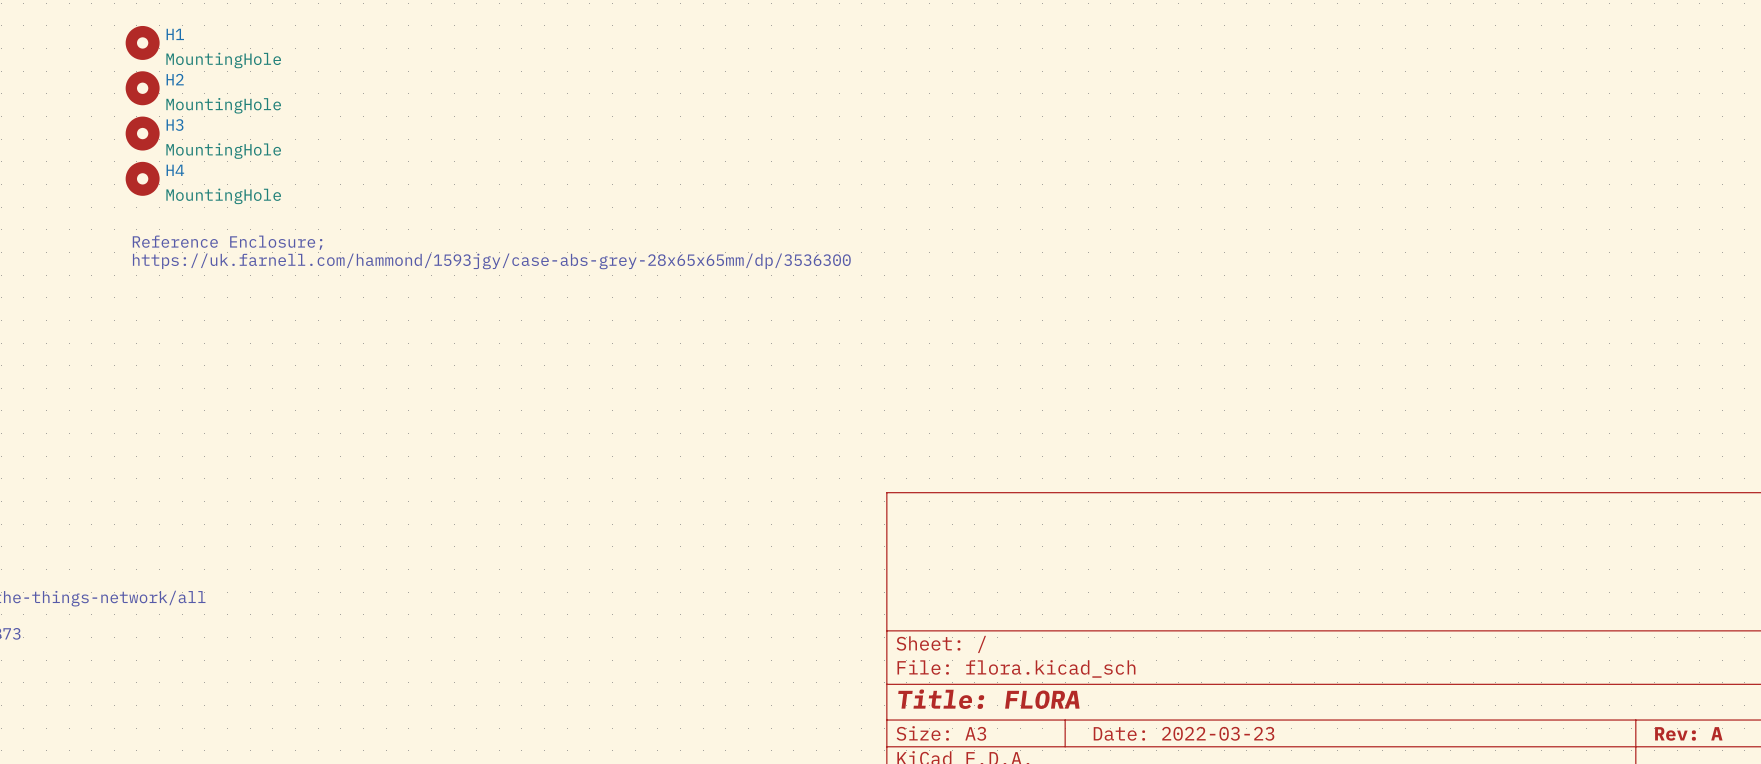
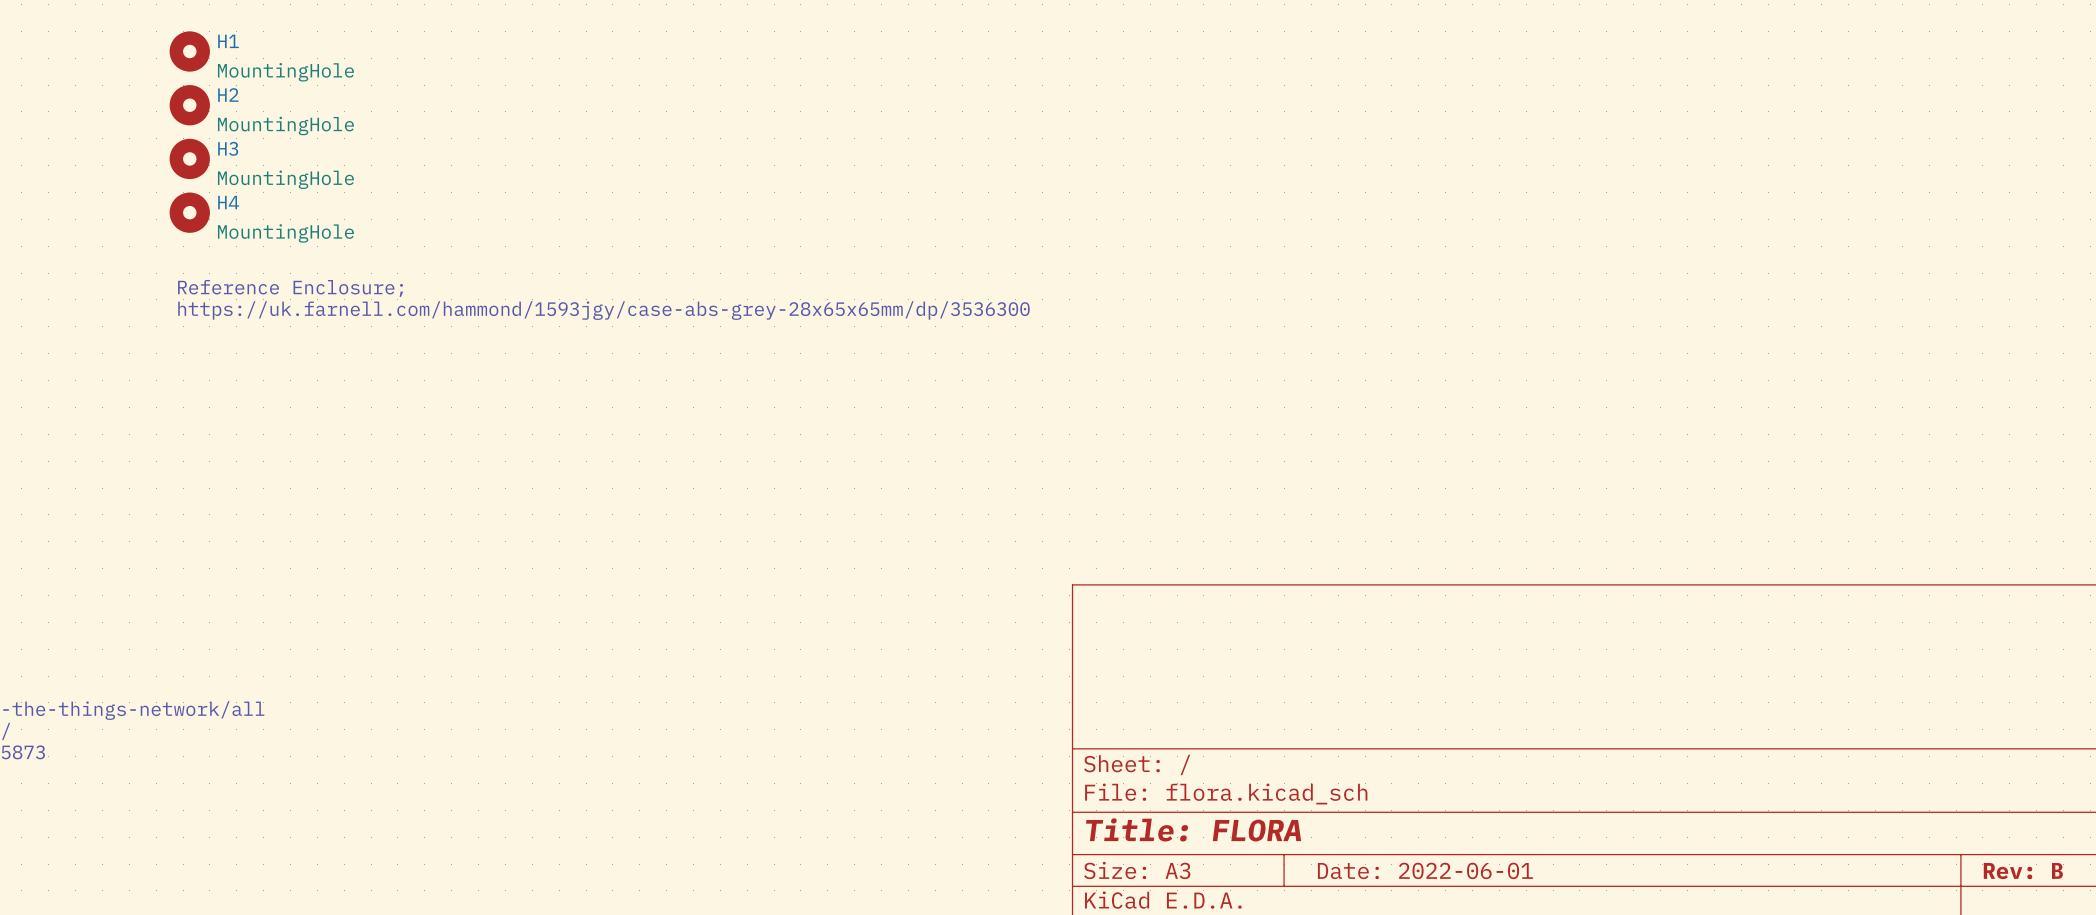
title block: Date: 2022-03-23 (1184, 733) -> Date: 2022-06-01 (1425, 870)
title block: Rev: A (1688, 733) -> Rev: B (2023, 871)

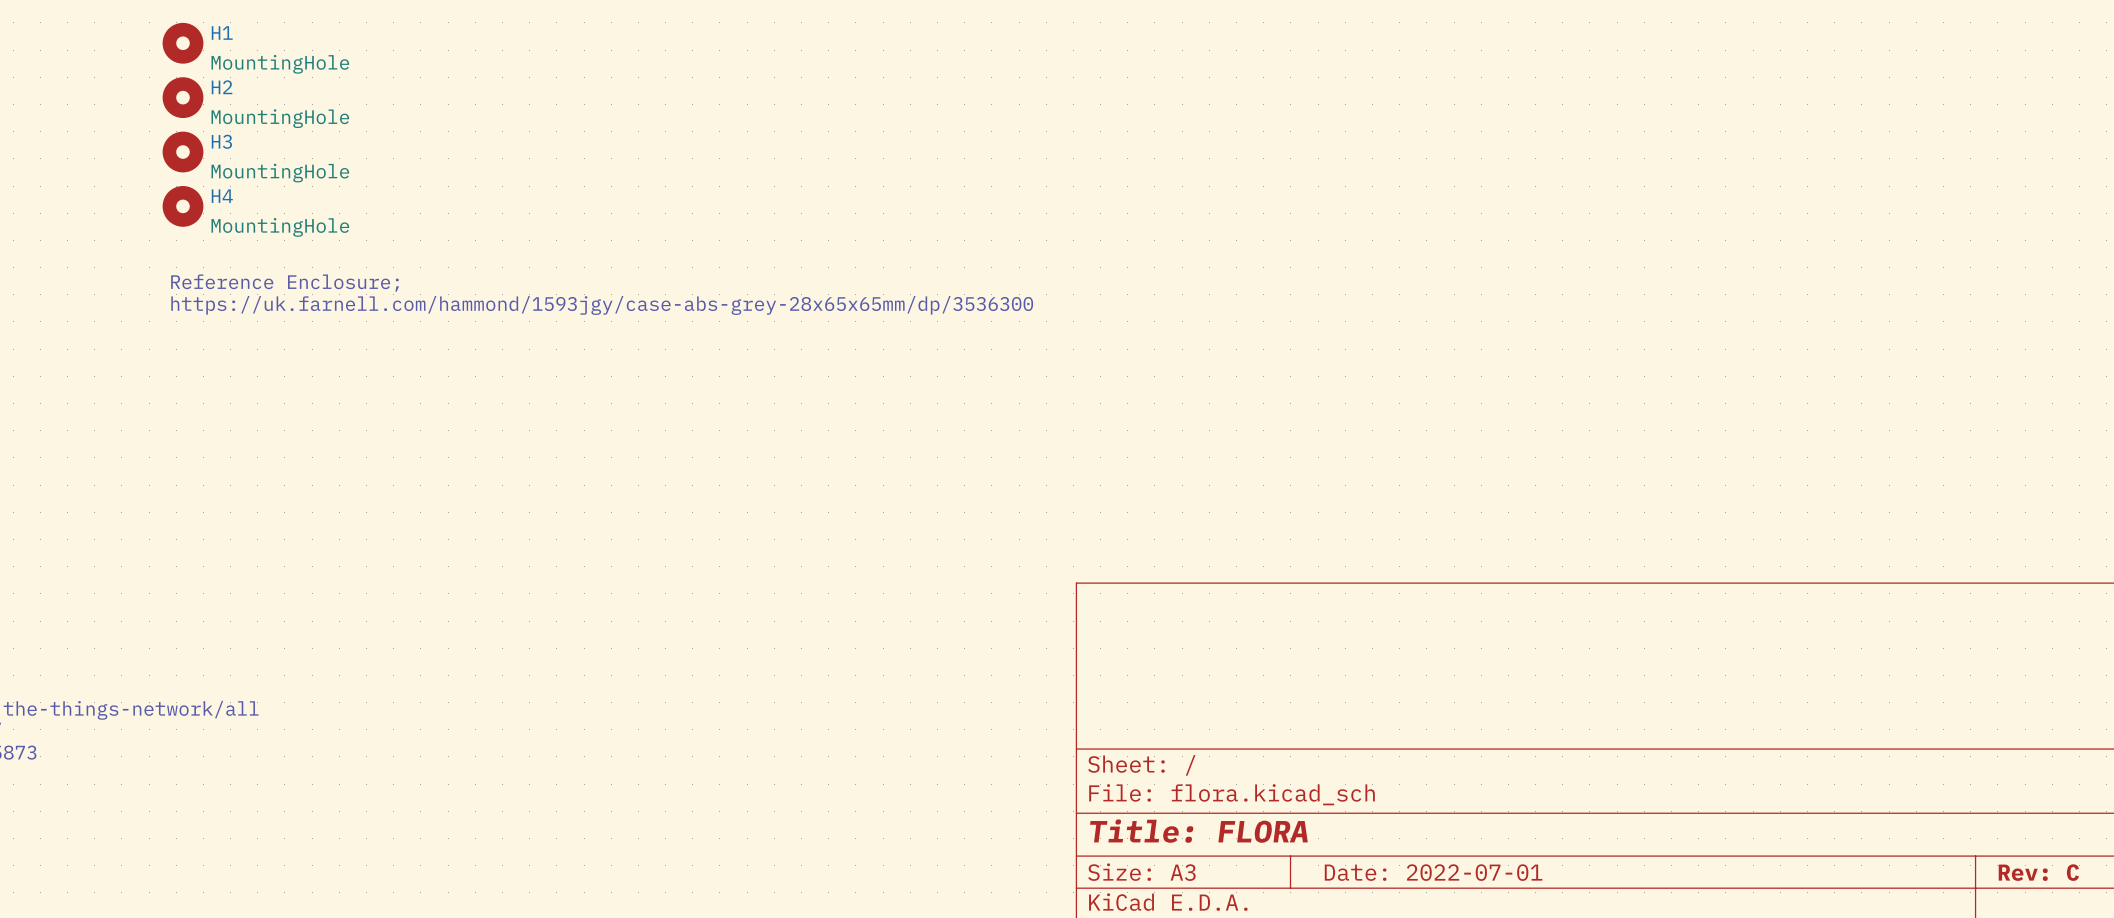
title block: Date: 2022-06-01 (1425, 870) -> Date: 2022-07-01 (1433, 872)
title block: Rev: B (2023, 871) -> Rev: C (2038, 872)

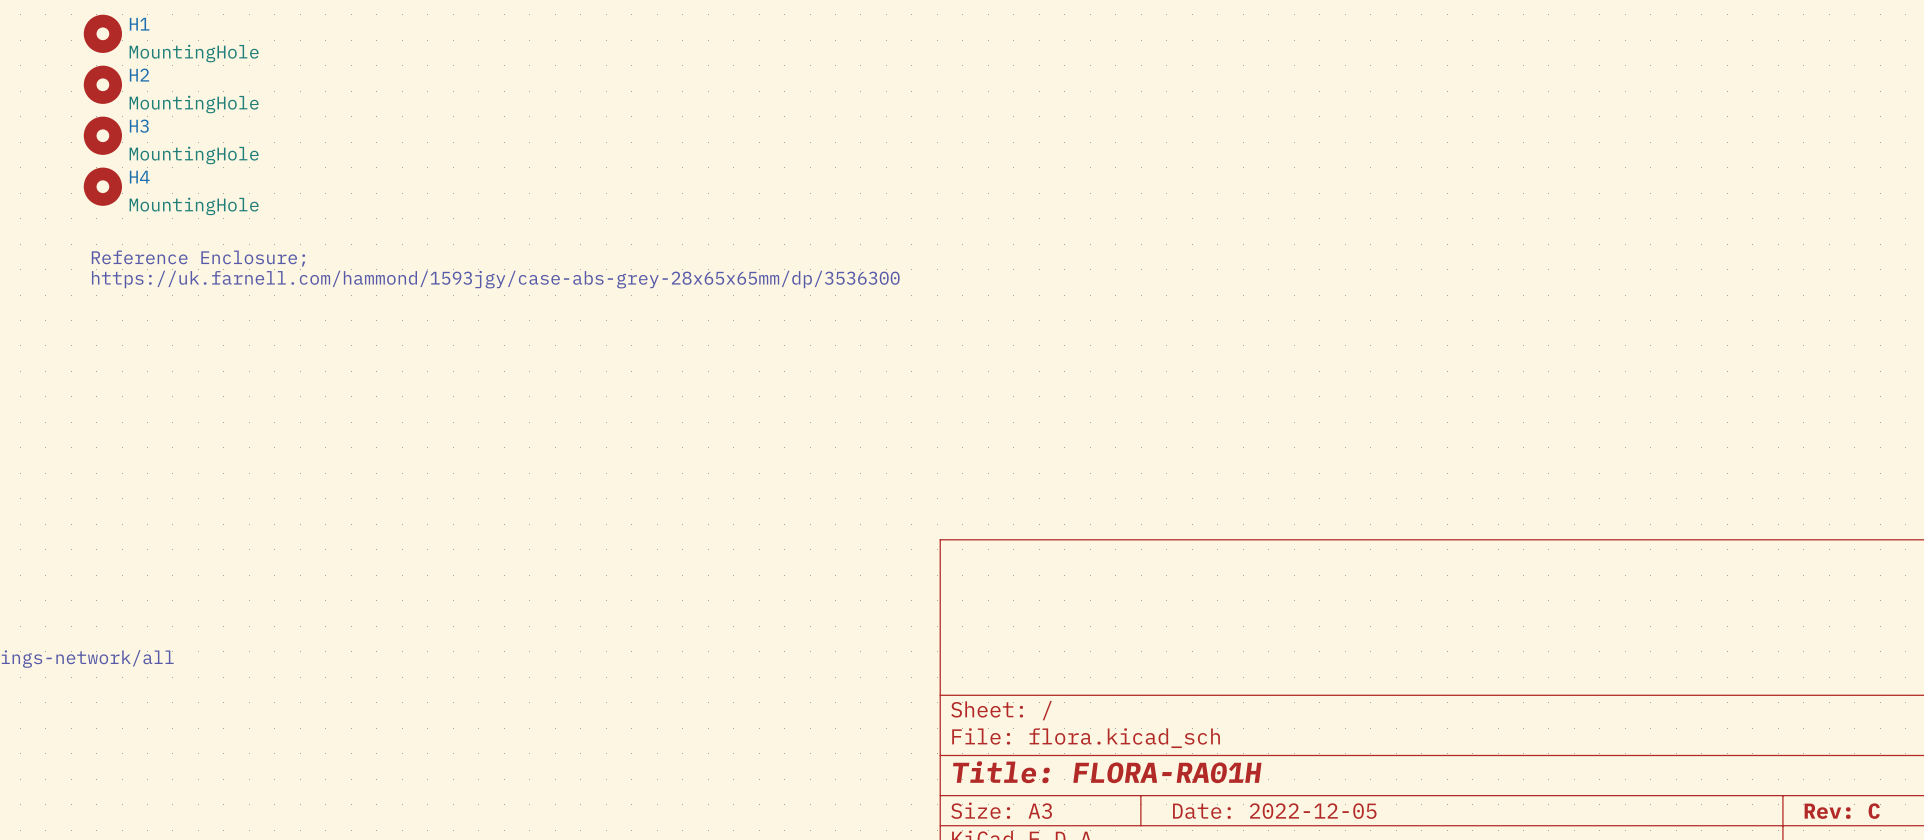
title block: Title: FLORA (1198, 831) -> Title: FLORA-RA01H (1107, 772)
title block: Date: 2022-07-01 (1433, 872) -> Date: 2022-12-05 (1274, 811)

